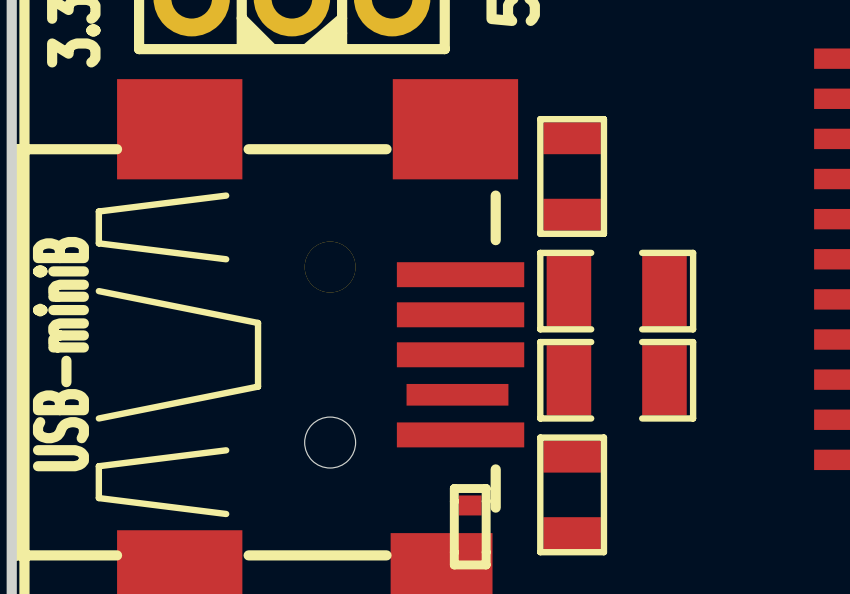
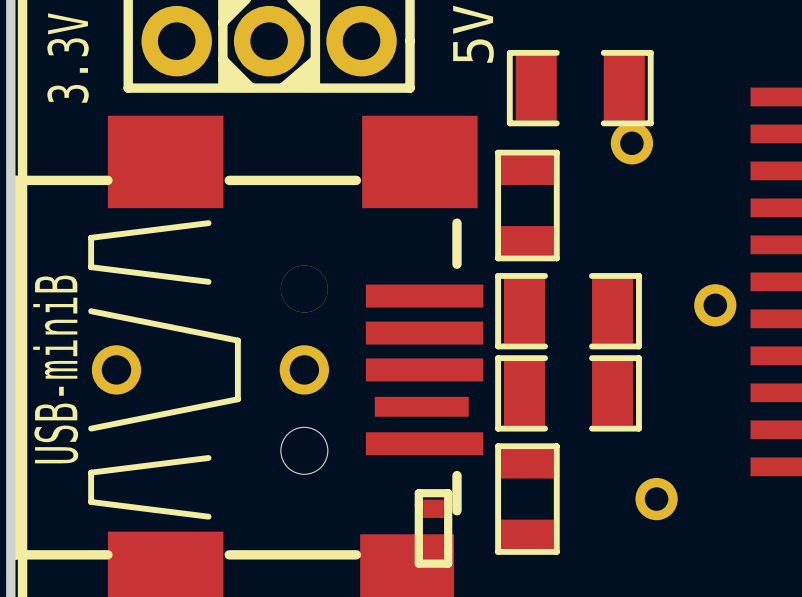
part: none -> (580, 88)
part: none -> (631, 143)
part: none -> (715, 305)
part: none -> (116, 369)
part: none -> (304, 369)
part: none -> (656, 499)

